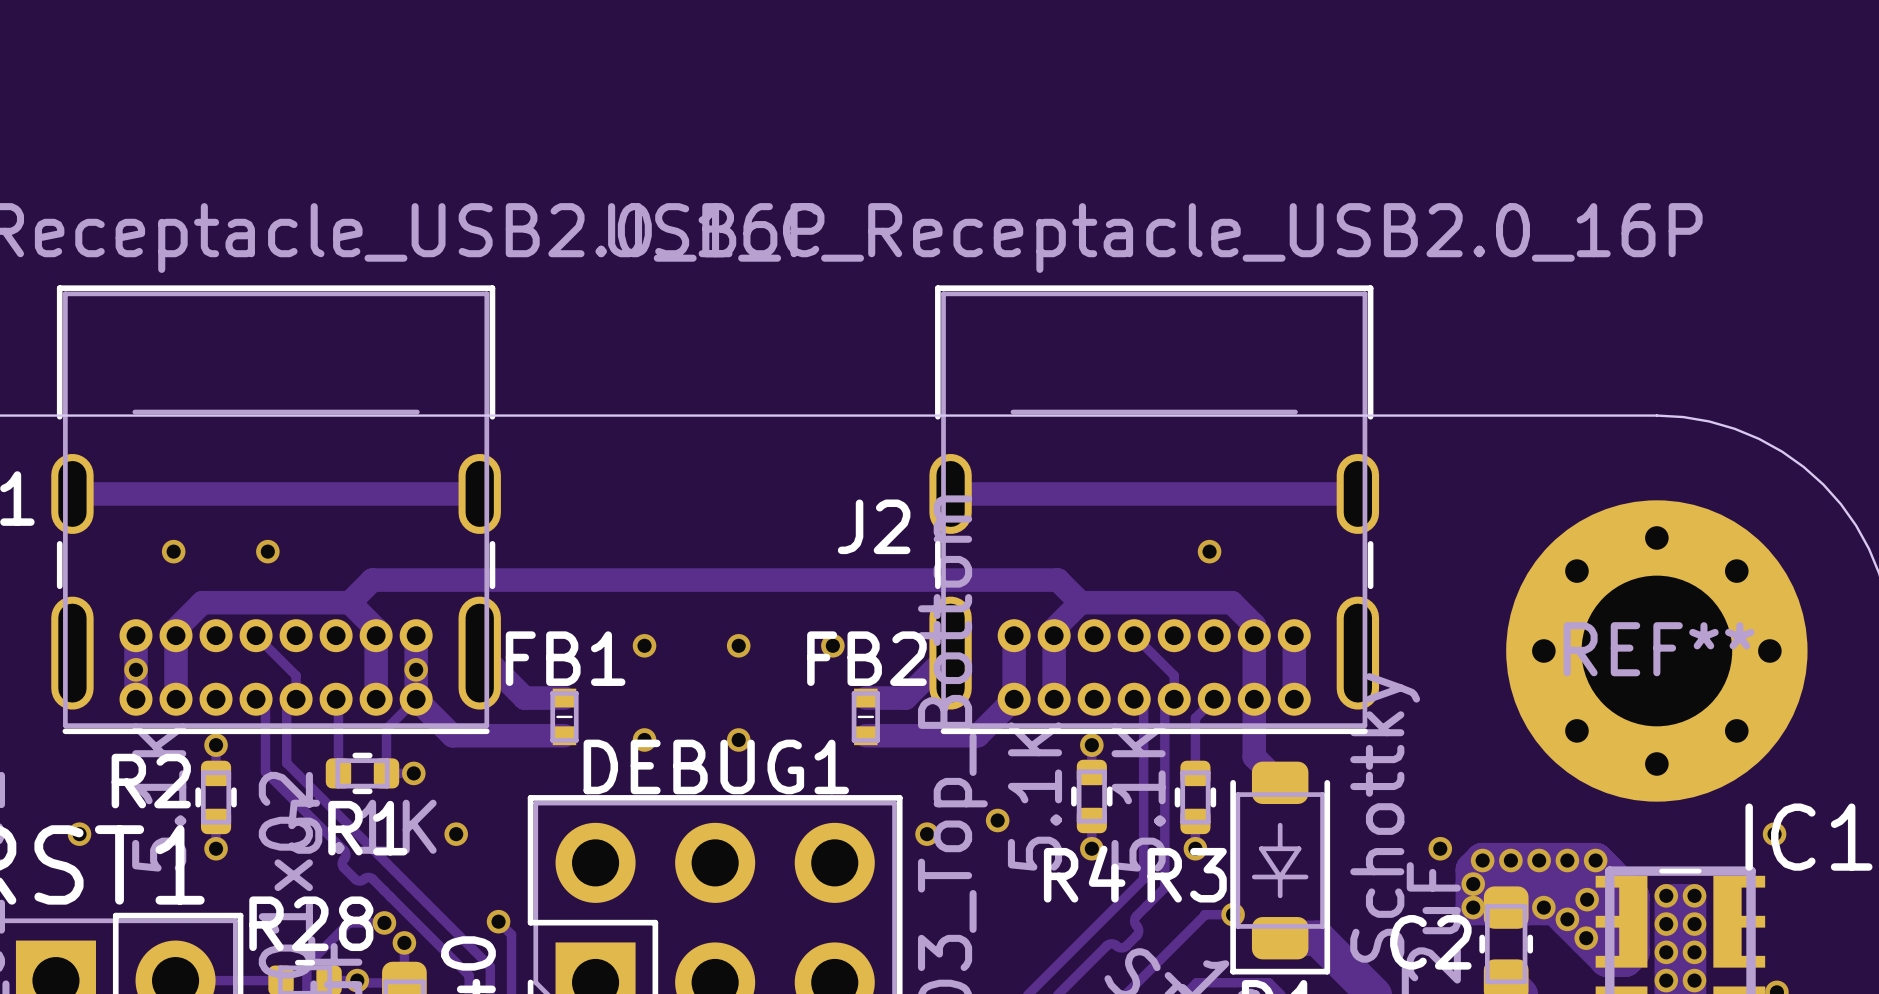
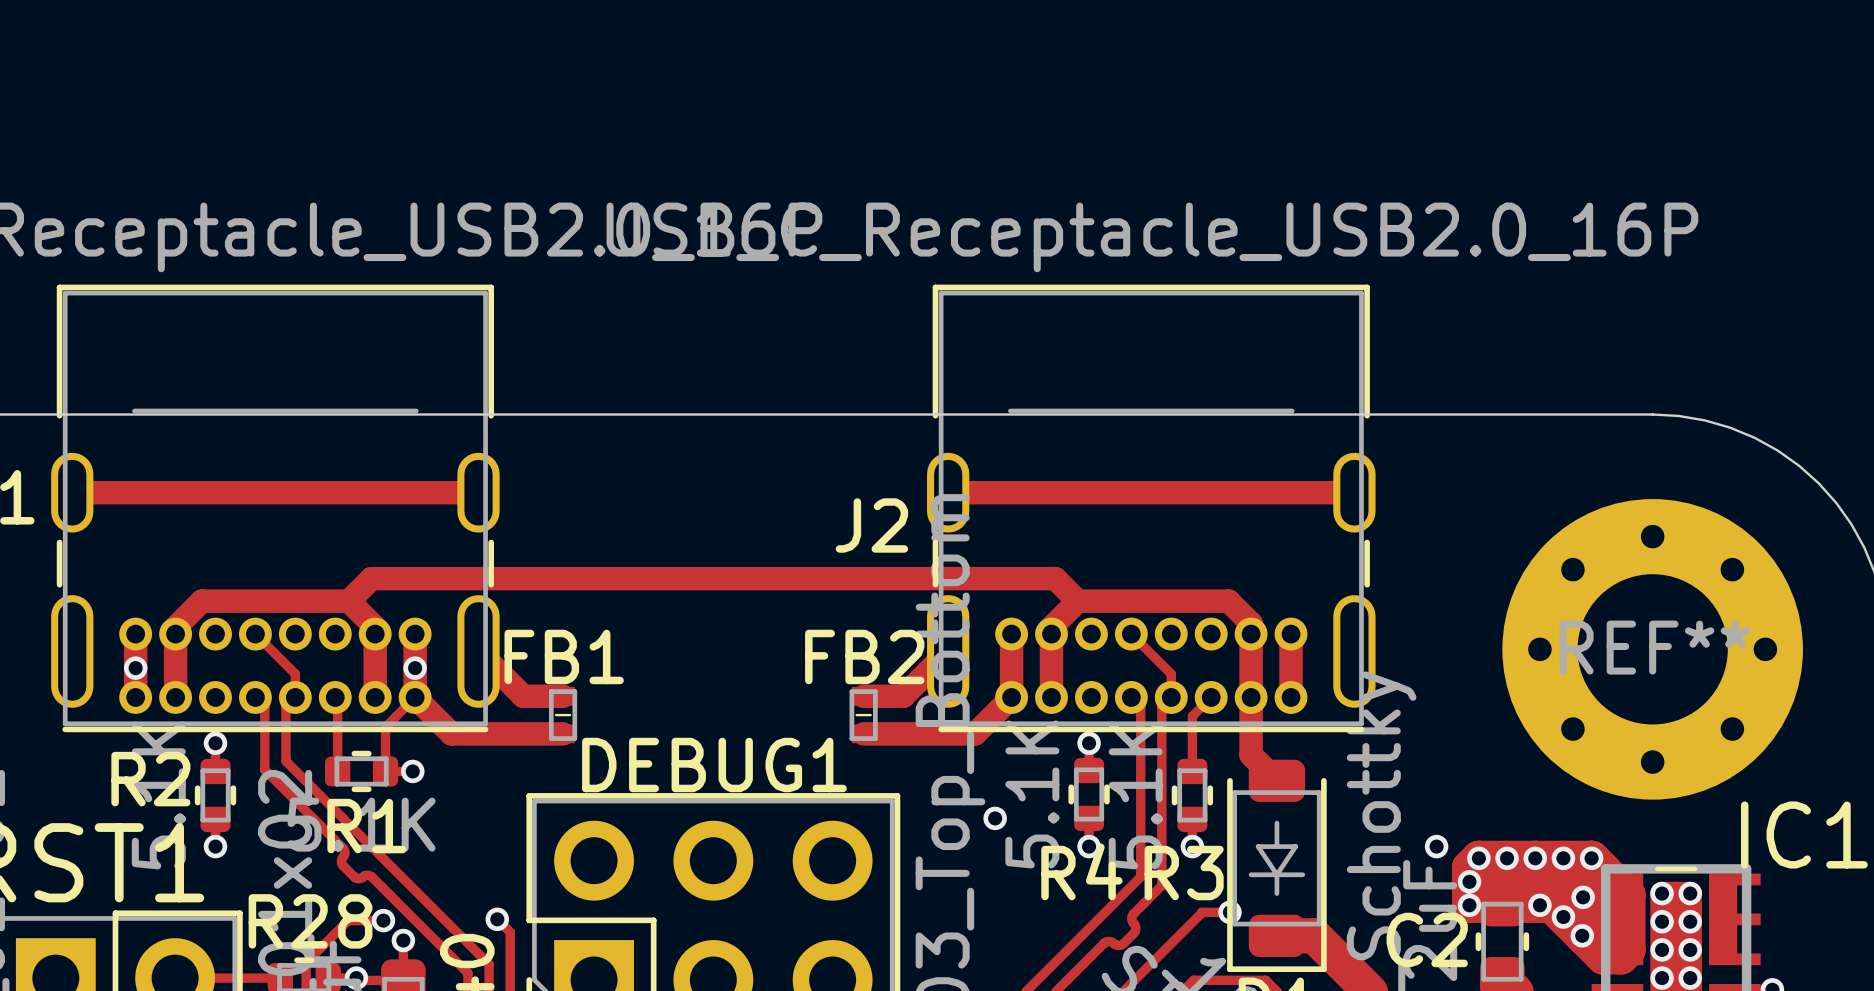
via: (173, 551) -> none
via: (267, 551) -> none
via: (1209, 551) -> none
via: (644, 645) -> none
via: (738, 645) -> none
via: (832, 645) -> none
via: (644, 739) -> none
via: (738, 739) -> none
via: (79, 834) -> none
via: (456, 834) -> none
via: (927, 834) -> none
via: (1774, 834) -> none

